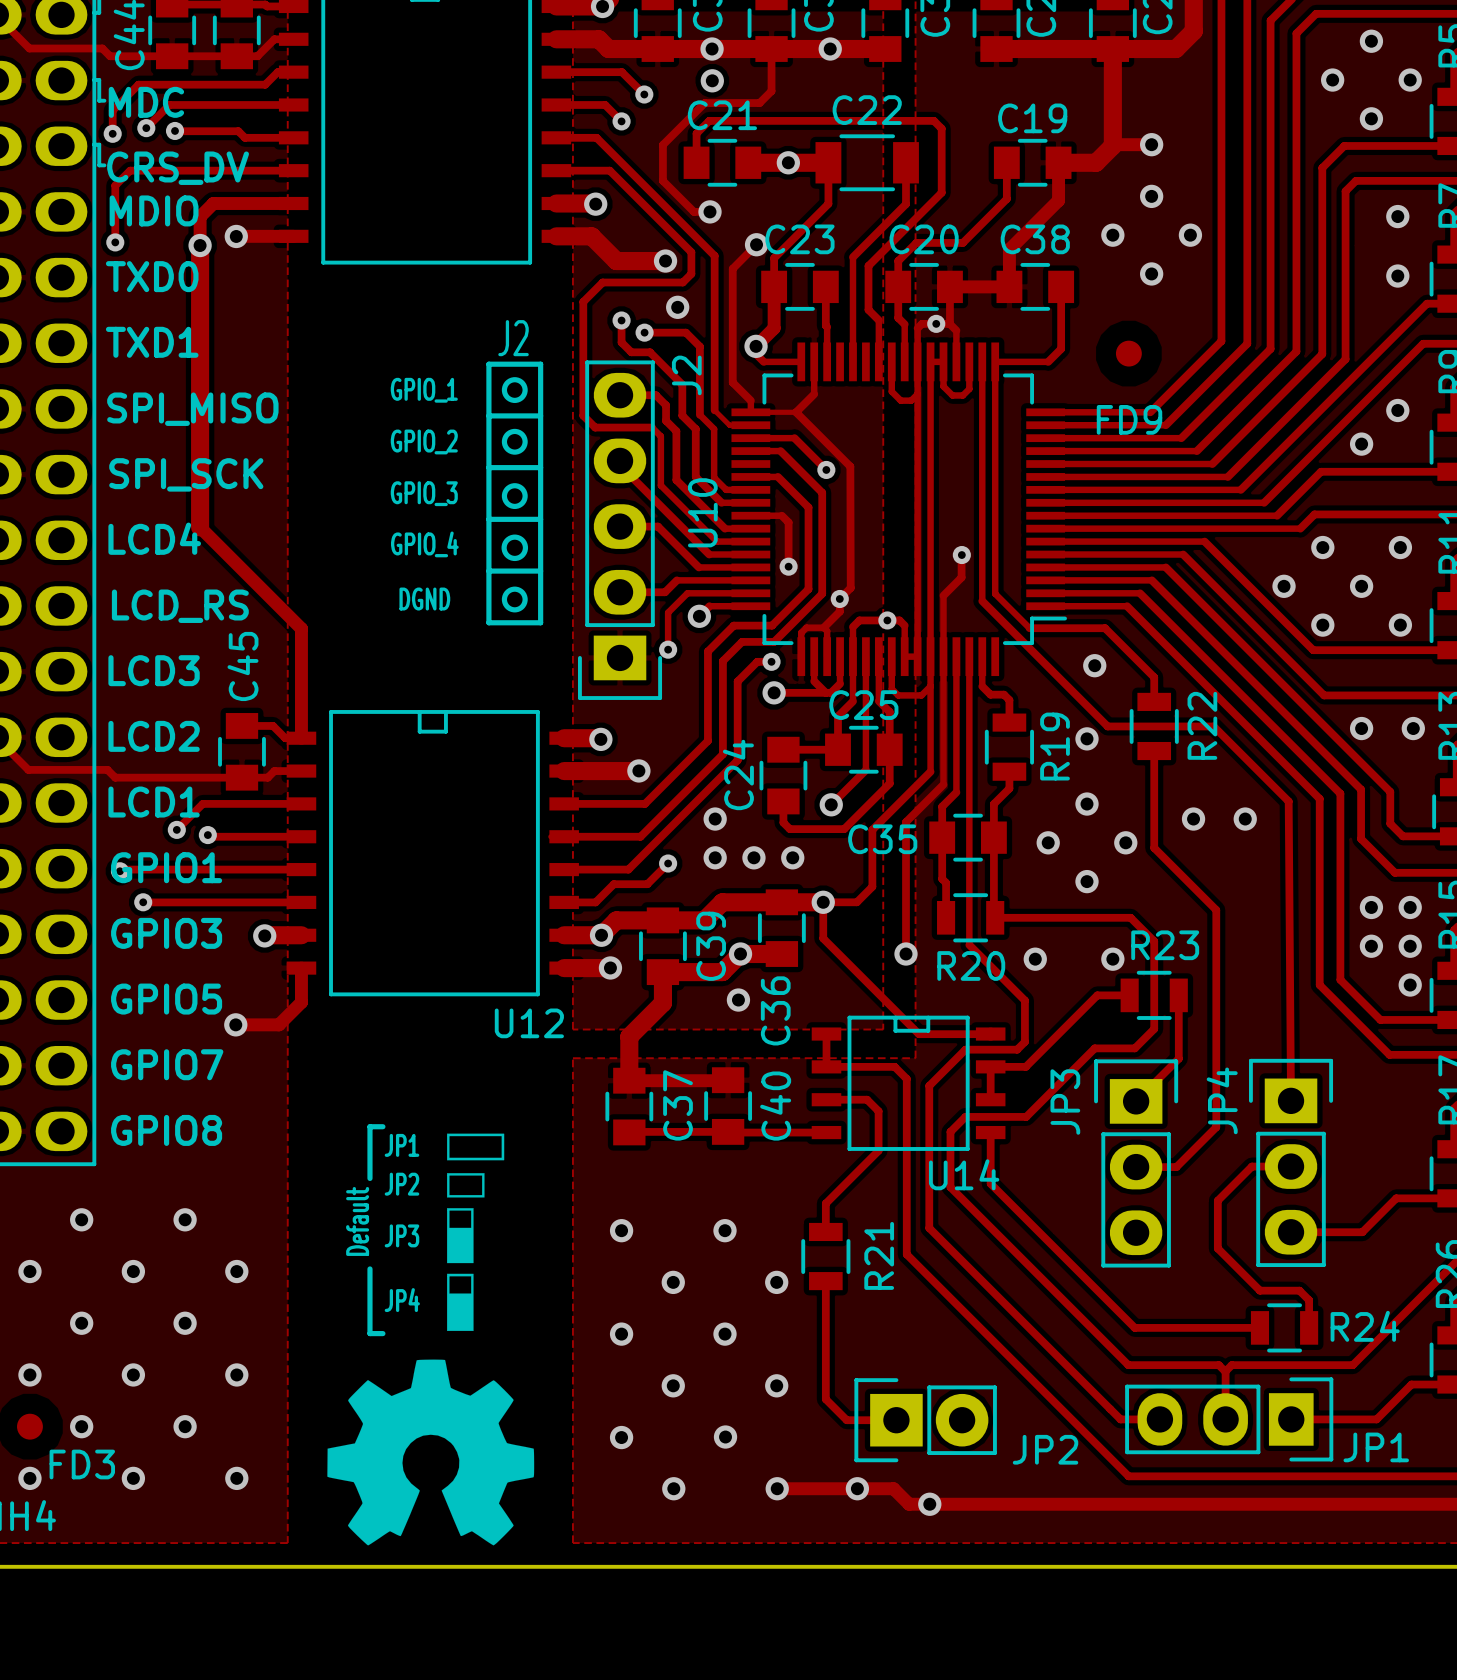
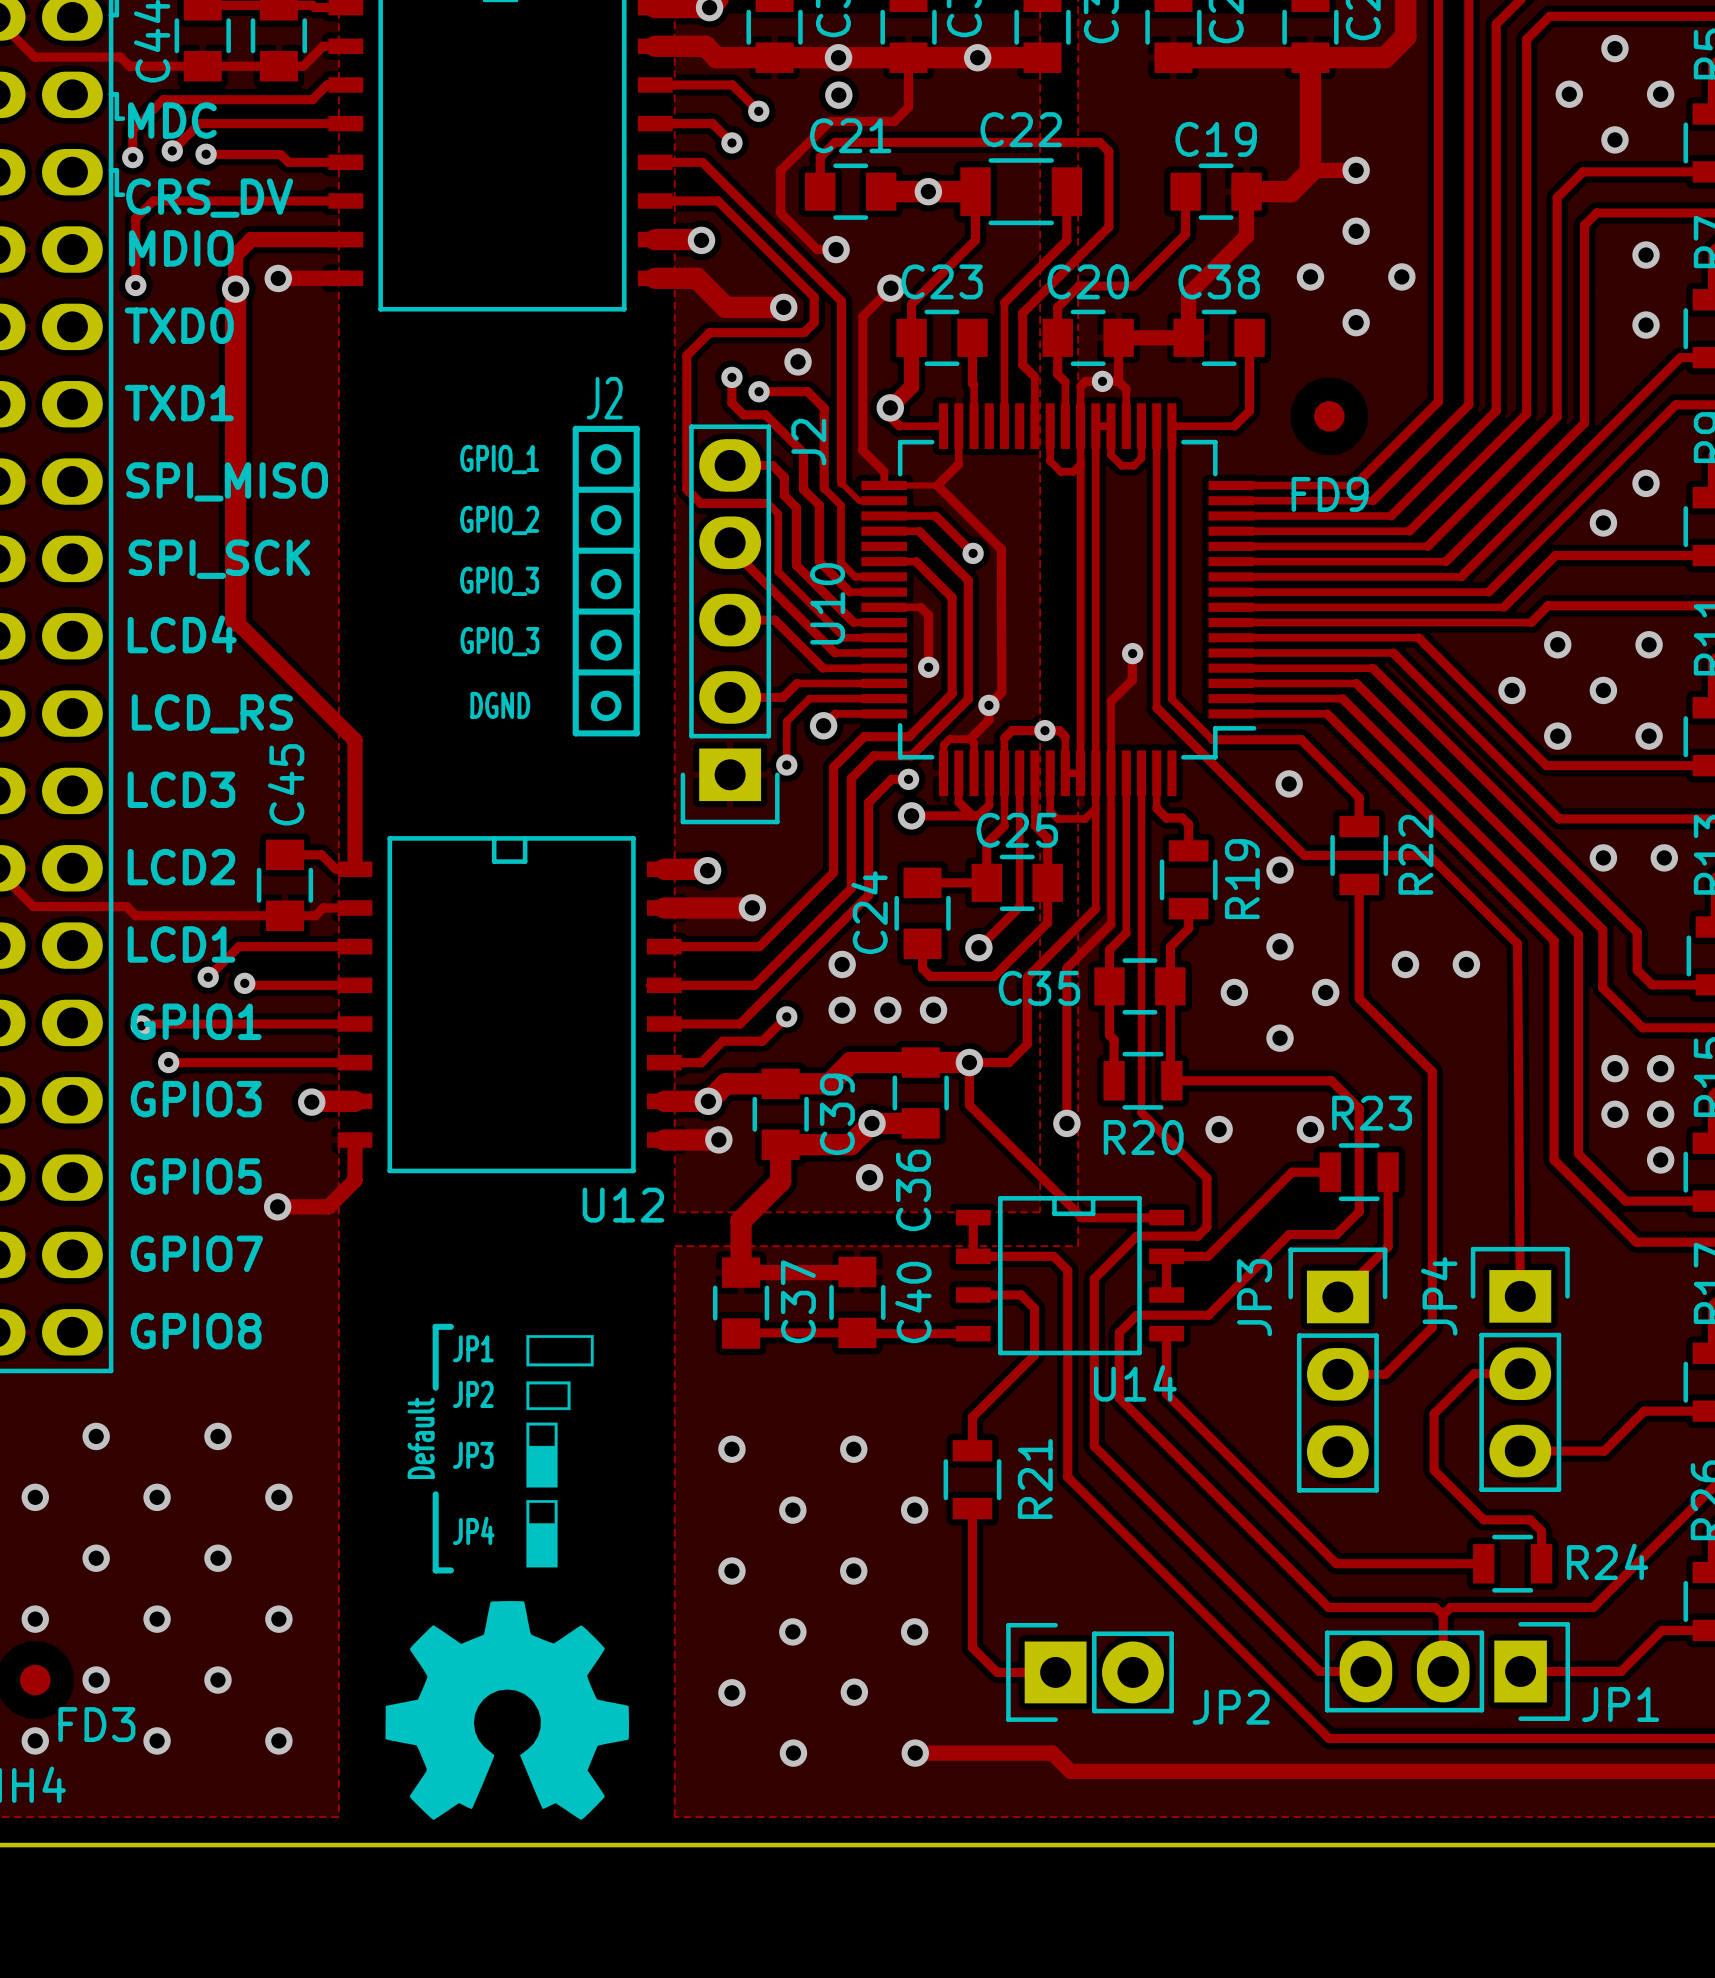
text: GPIO_4 (424, 544) -> GPIO_3 (499, 641)
via: (857, 1488) -> none
via: (929, 1504) -> none

